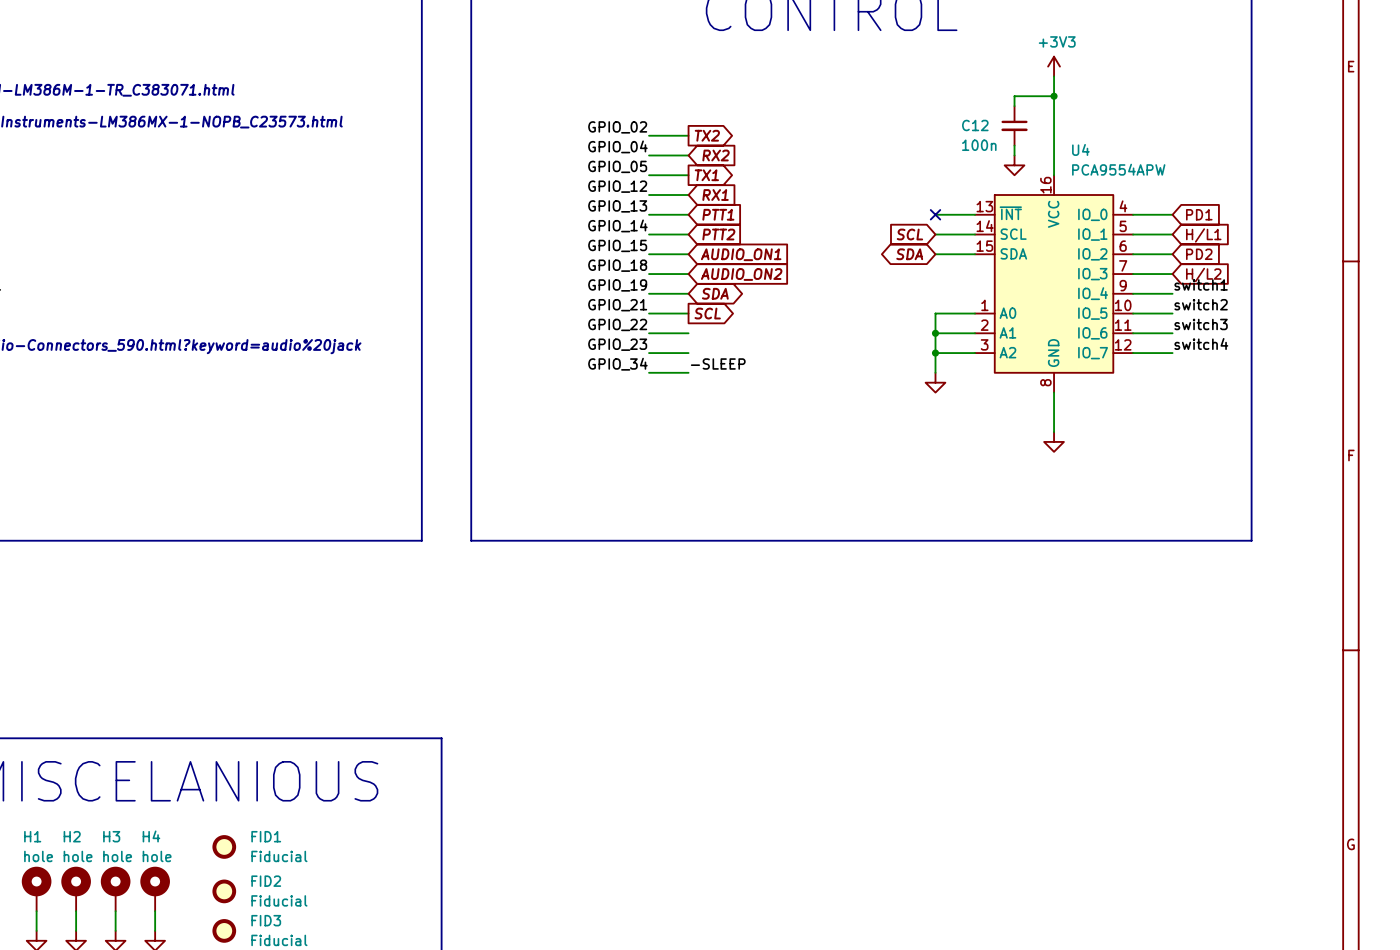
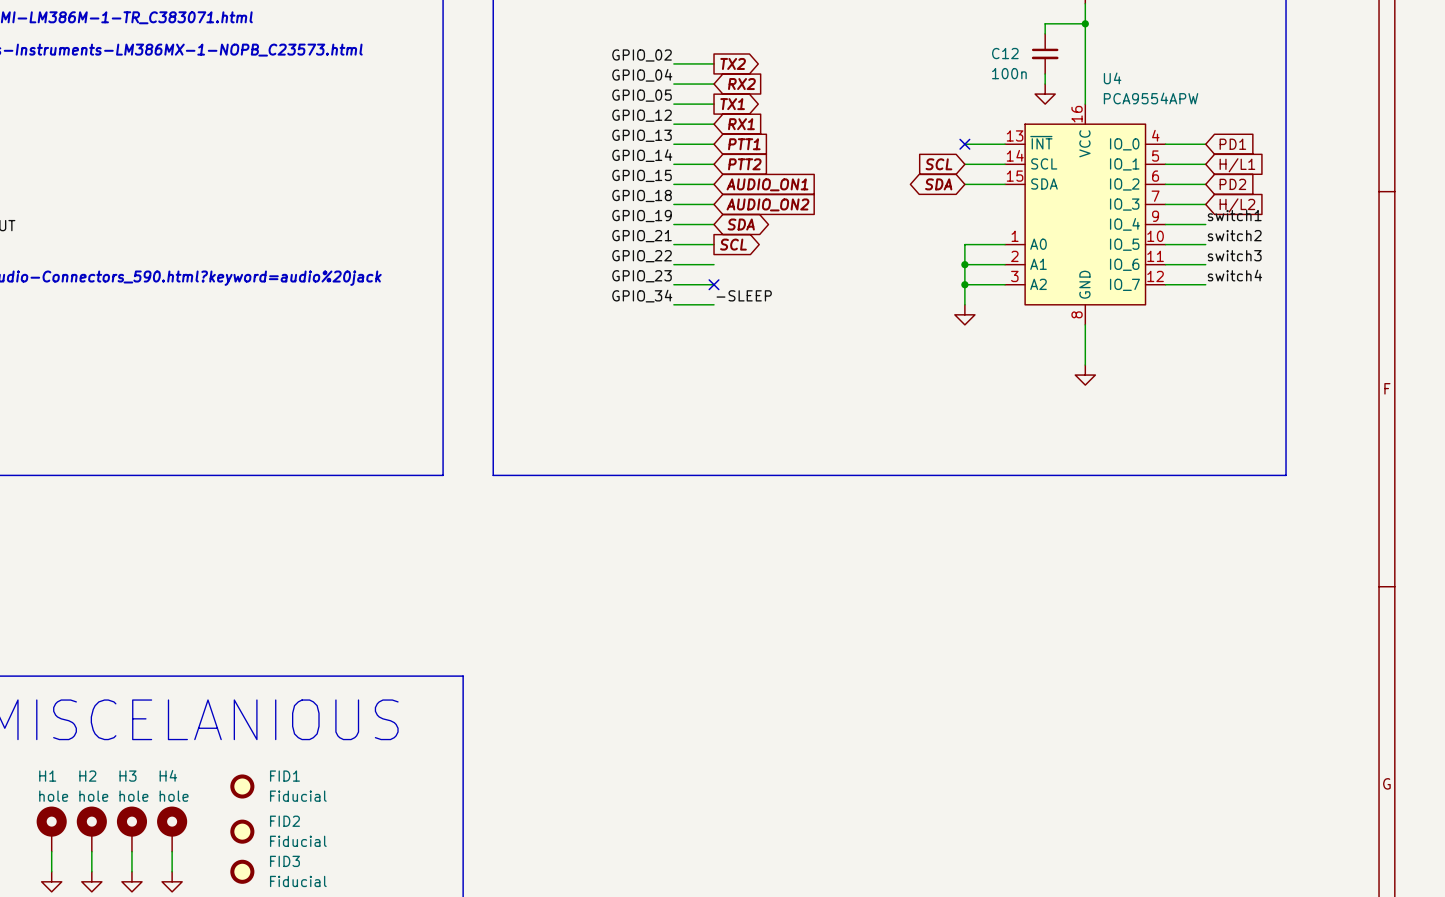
no-connect mark: none -> (714, 284)

